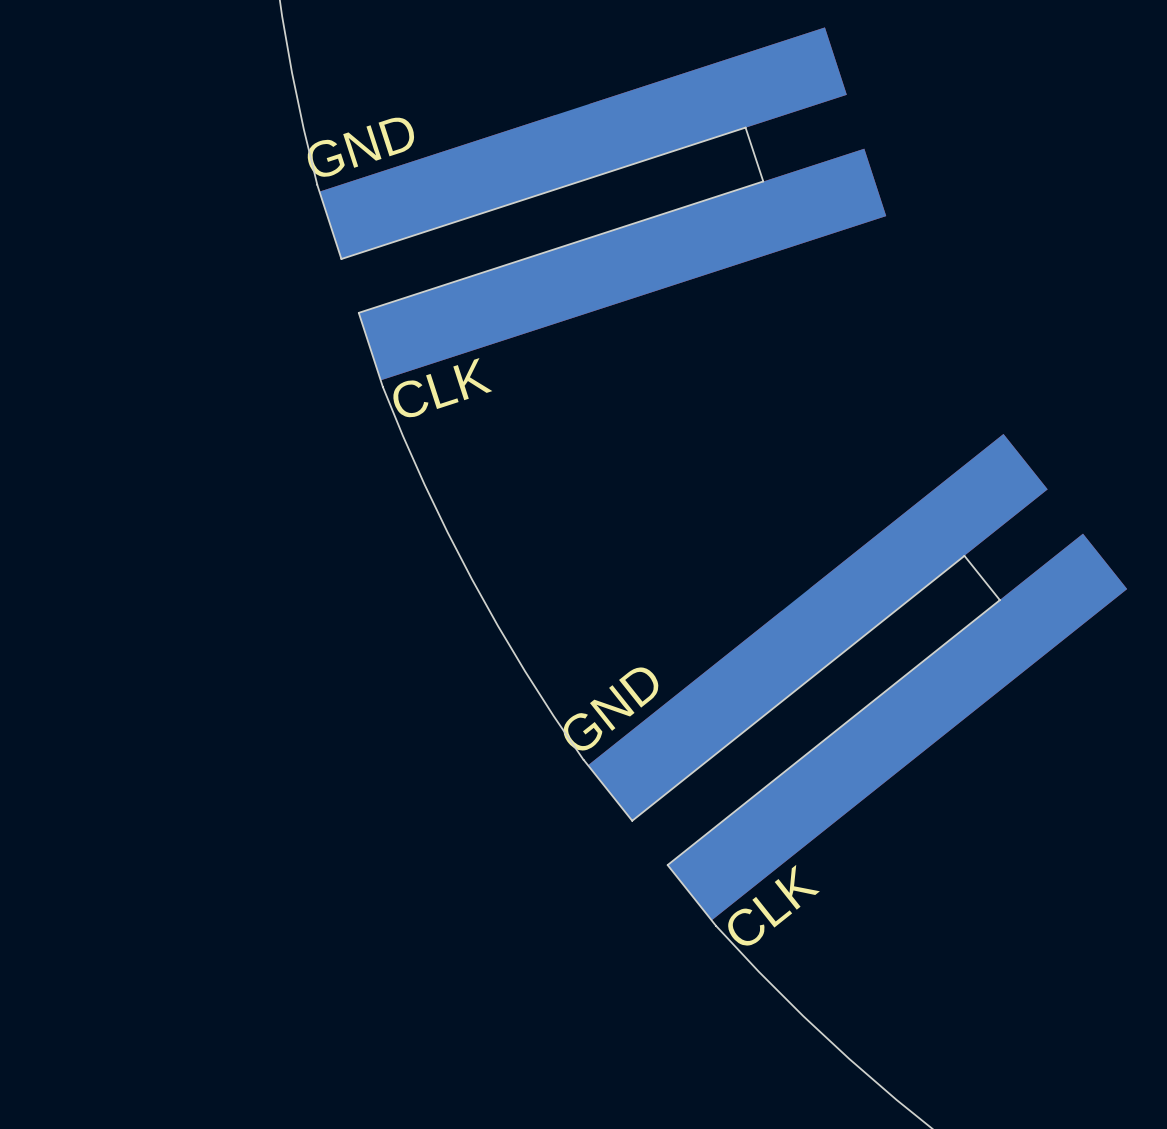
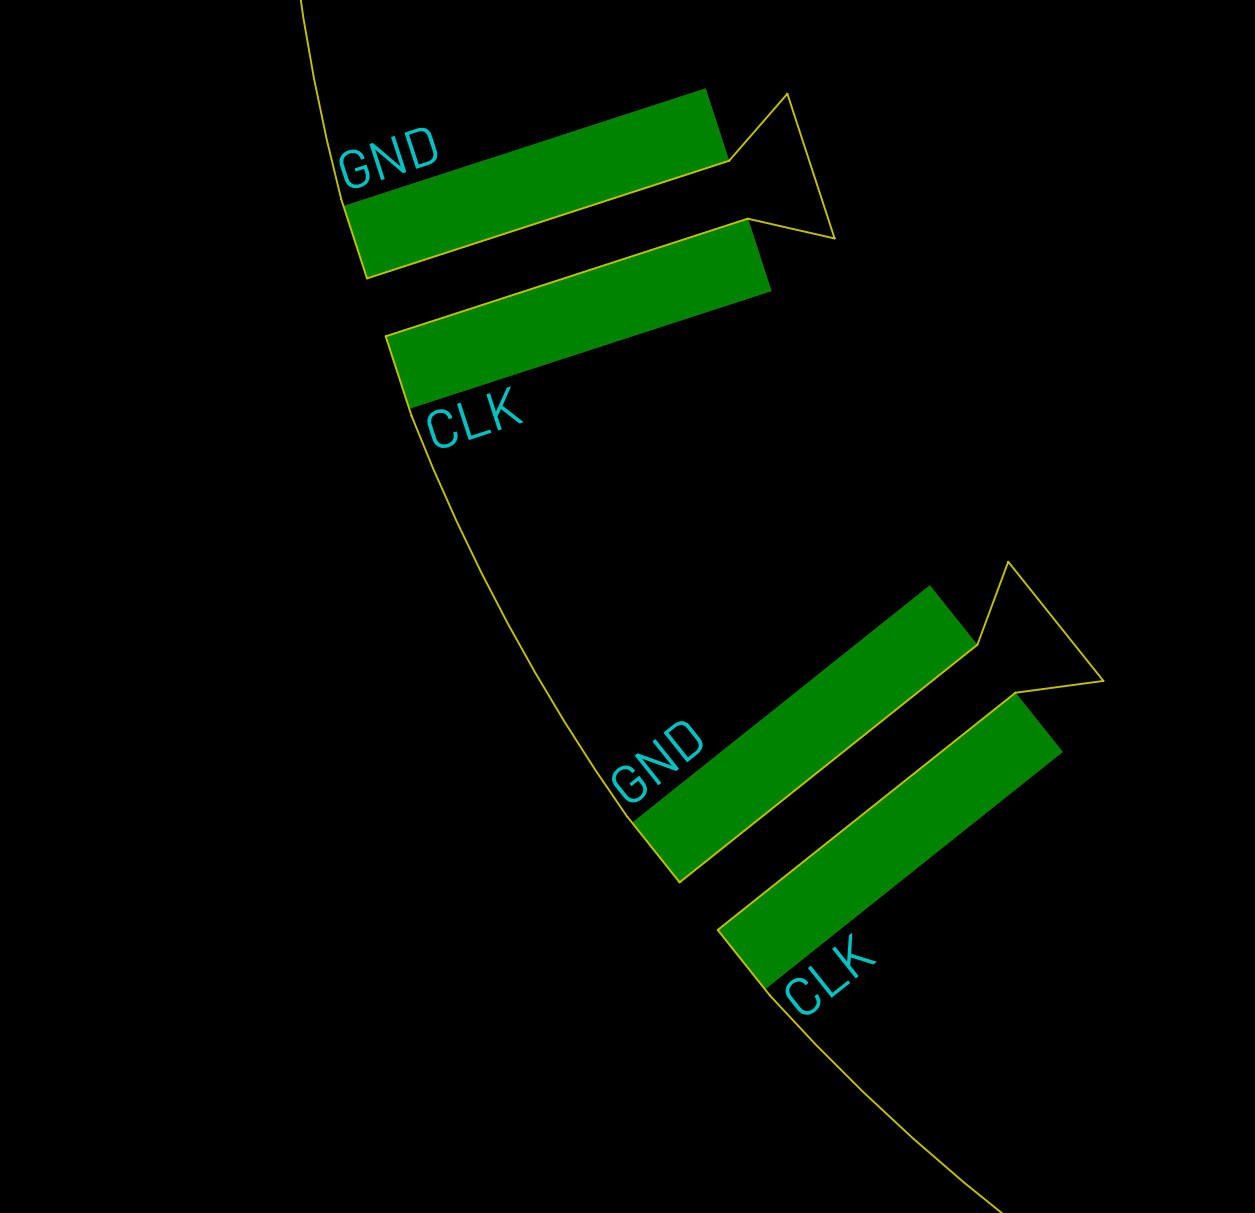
part: (602, 203) -> none
part: none -> (557, 248)
board edge: (341, 259) (745, 127) (763, 181) (358, 312) -> (367, 278) (729, 160) (787, 93) (834, 238) (747, 218) (385, 336)
part: (857, 677) -> none
part: none -> (847, 787)
board edge: (632, 820) (964, 555) (999, 600) (667, 865) -> (679, 882) (977, 644) (1008, 561) (1103, 680) (1015, 692) (717, 929)

